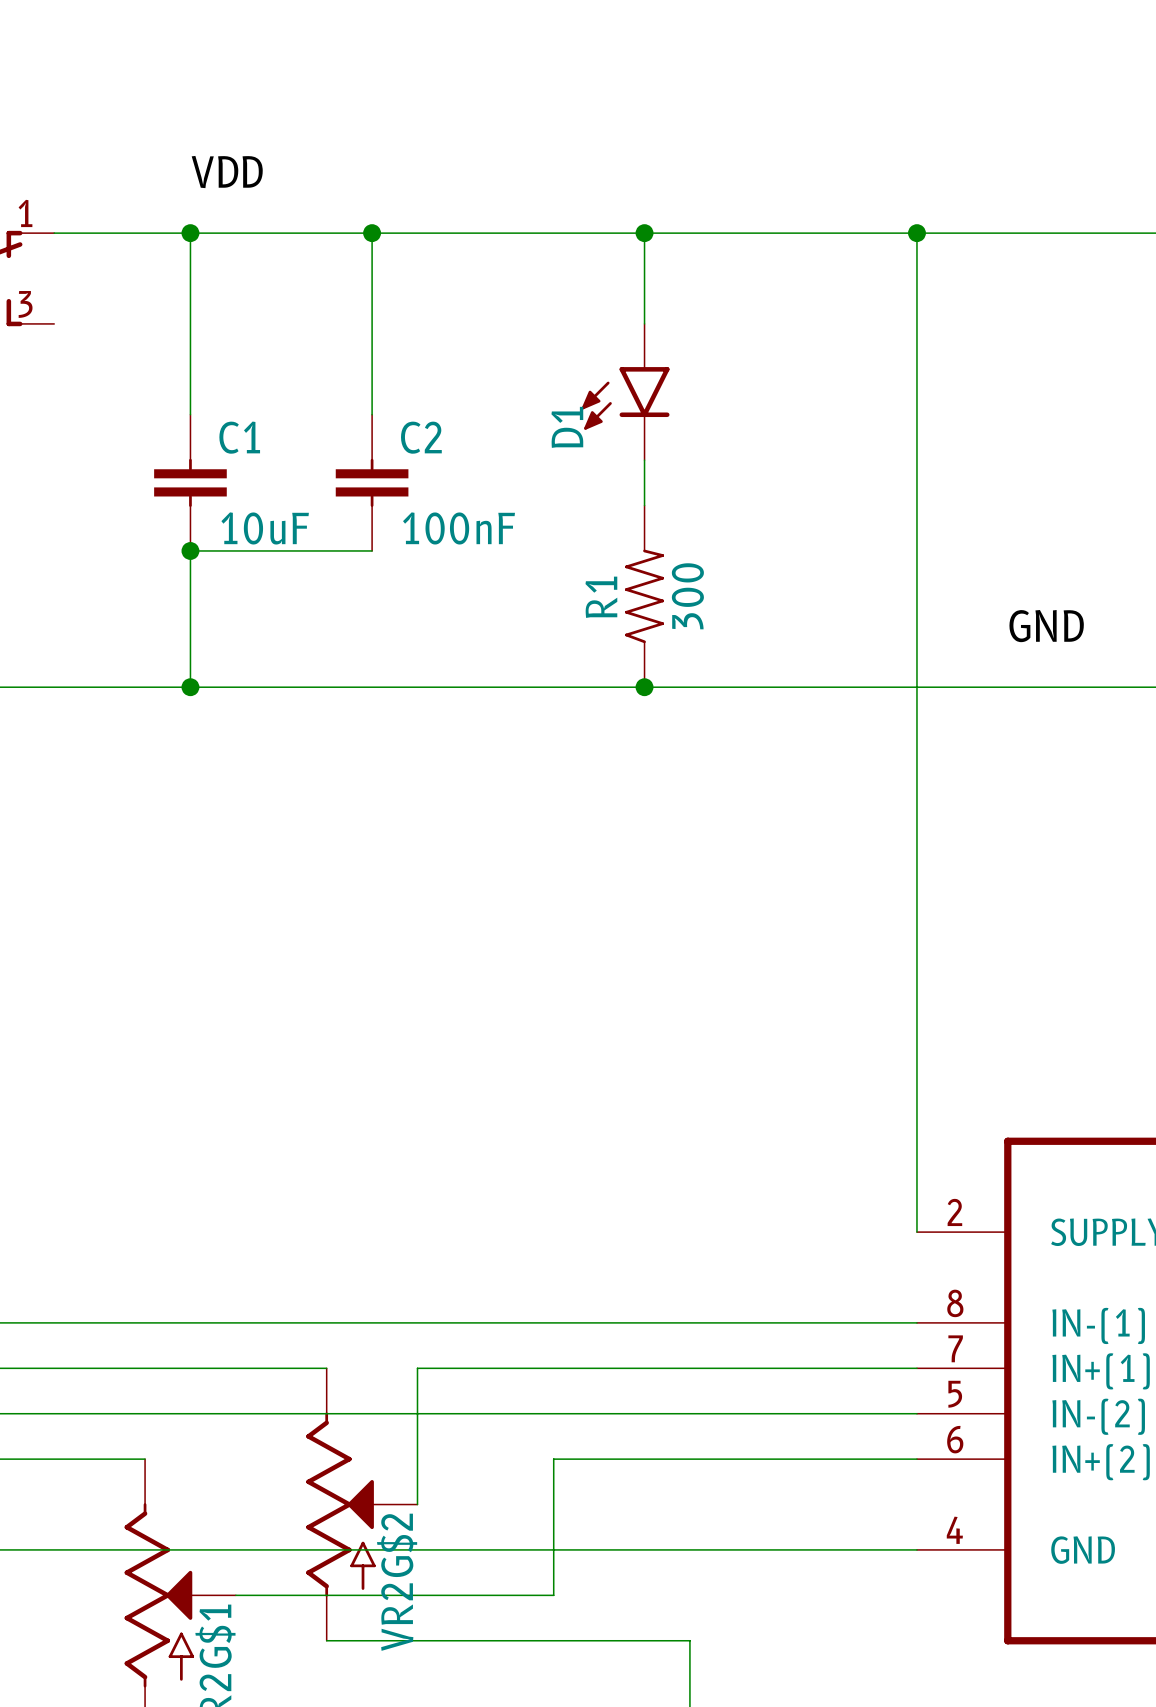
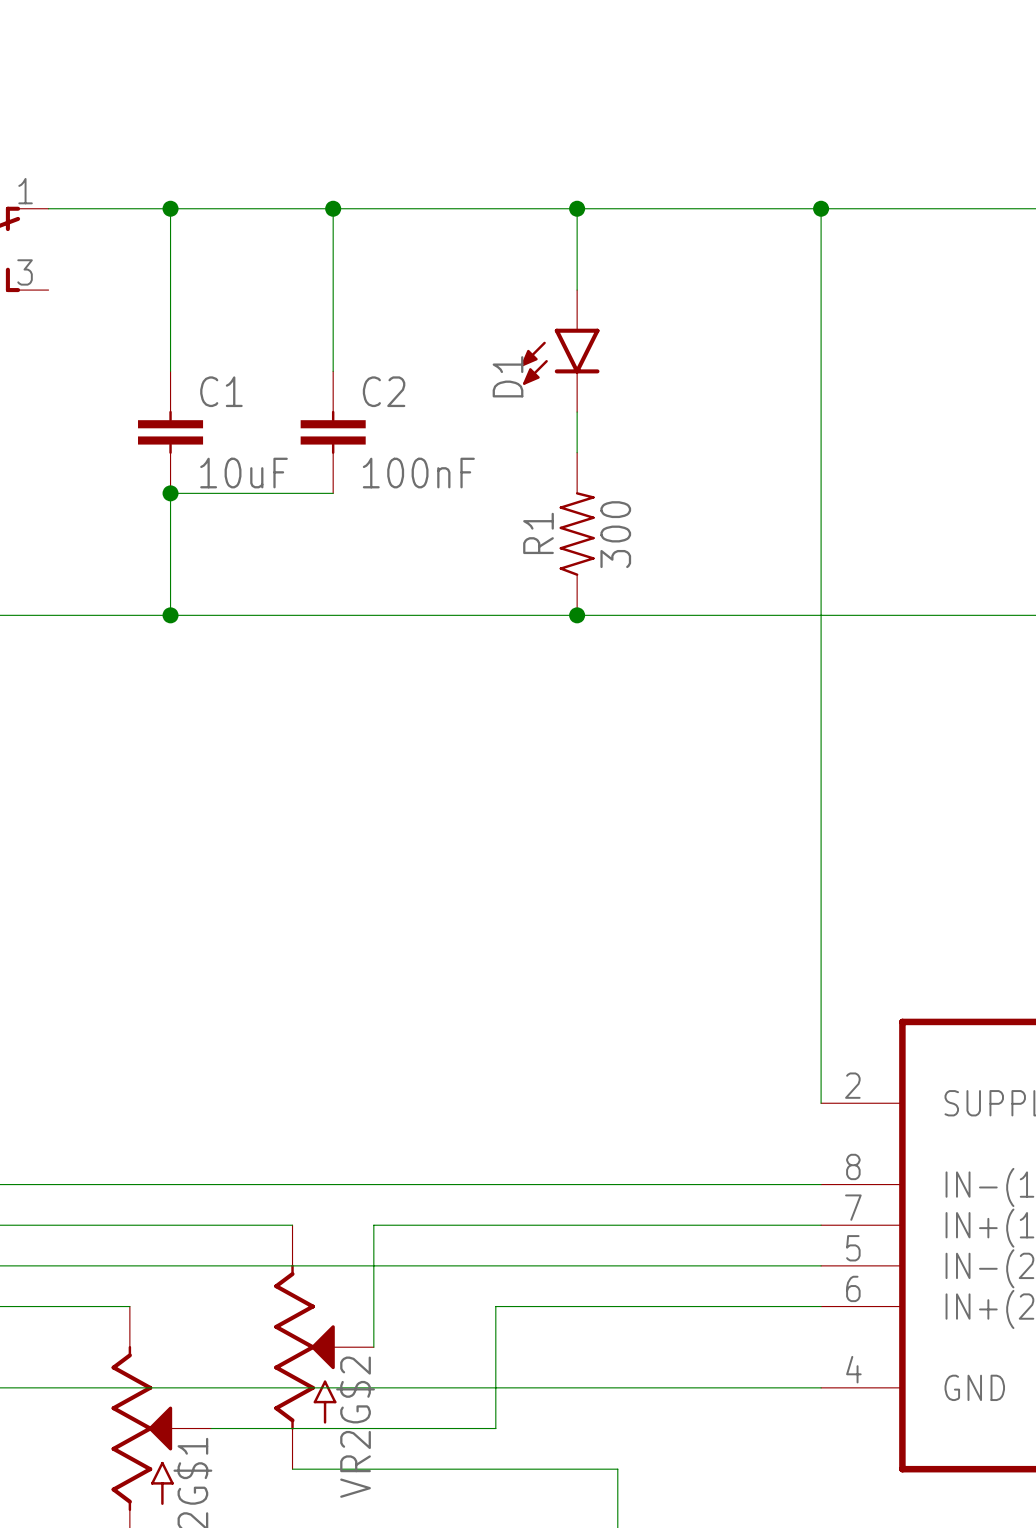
label: VDD (227, 172) -> none
label: GND (1046, 626) -> none

